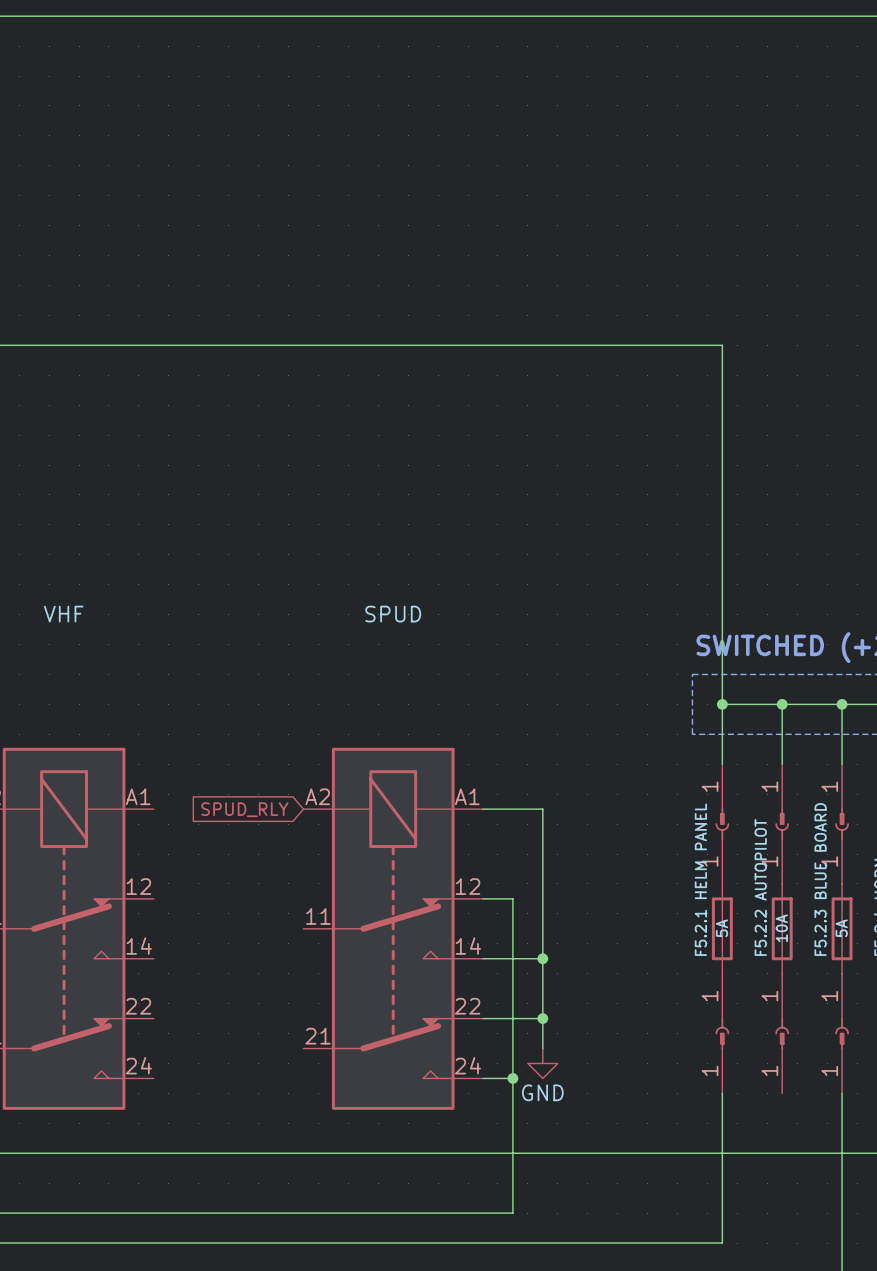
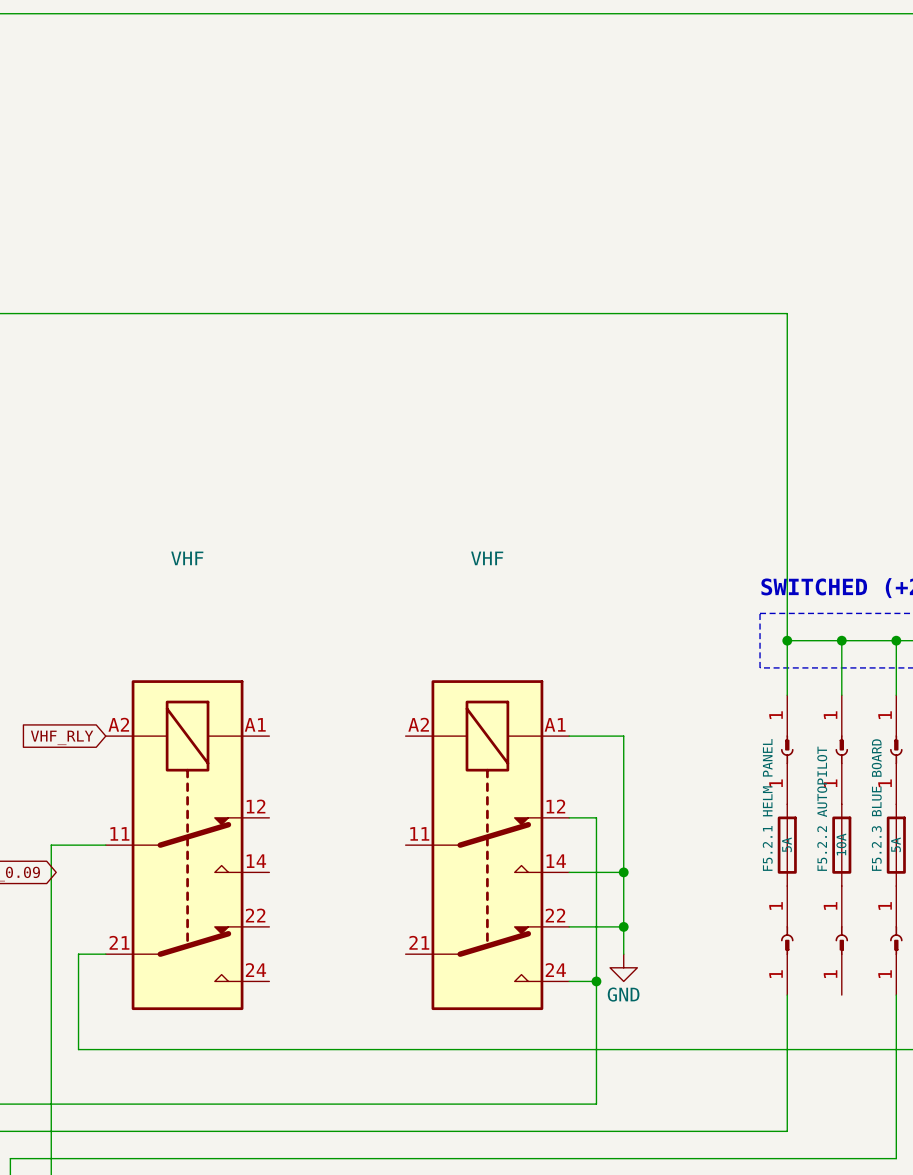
part value: SPUD (393, 614) -> VHF (487, 558)
global label: SPUD_RLY (244, 809) -> none

